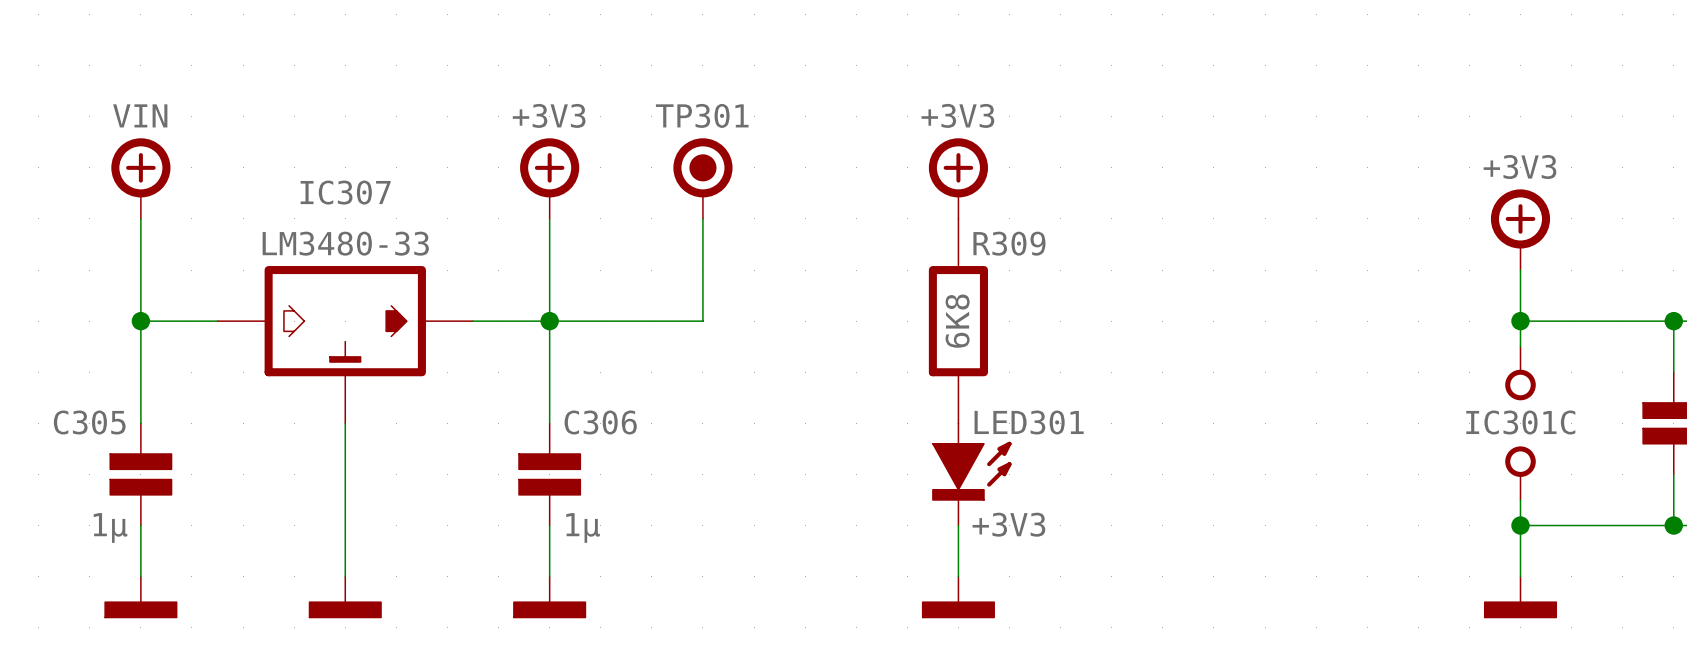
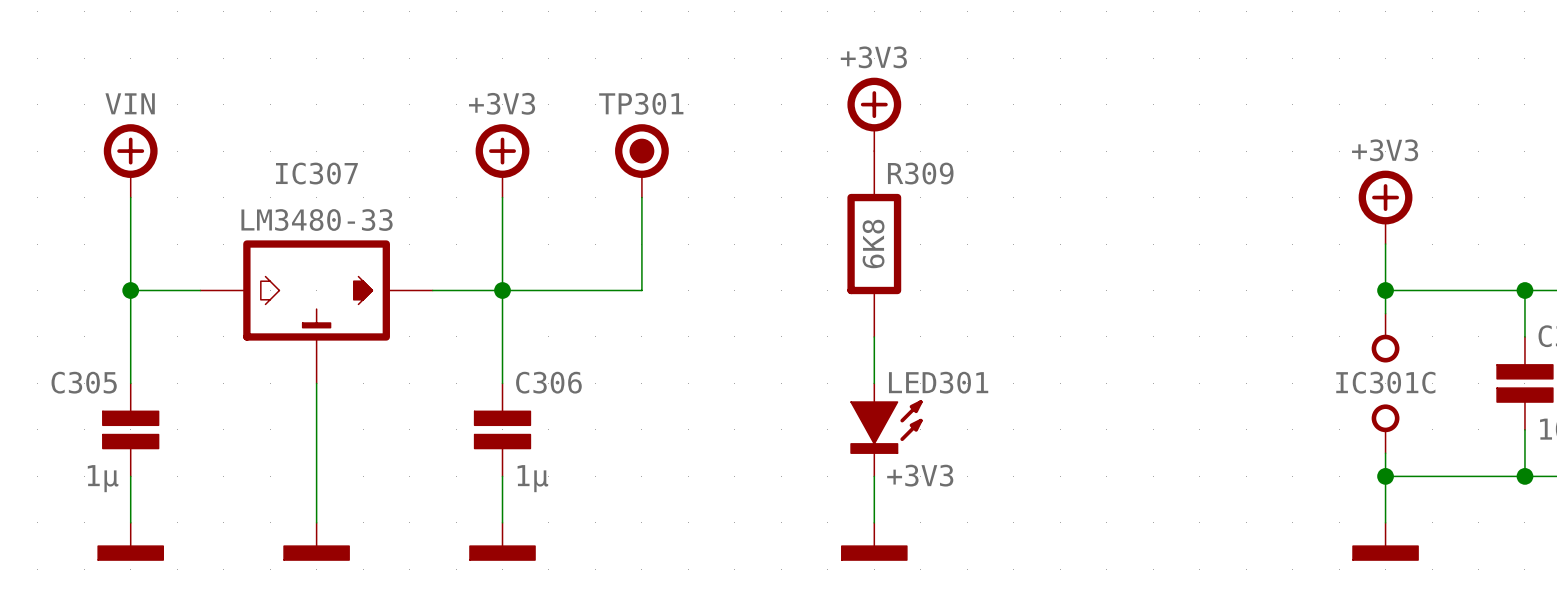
power symbol position: (958, 178) -> (874, 114)
R309 position: (958, 321) -> (874, 244)

